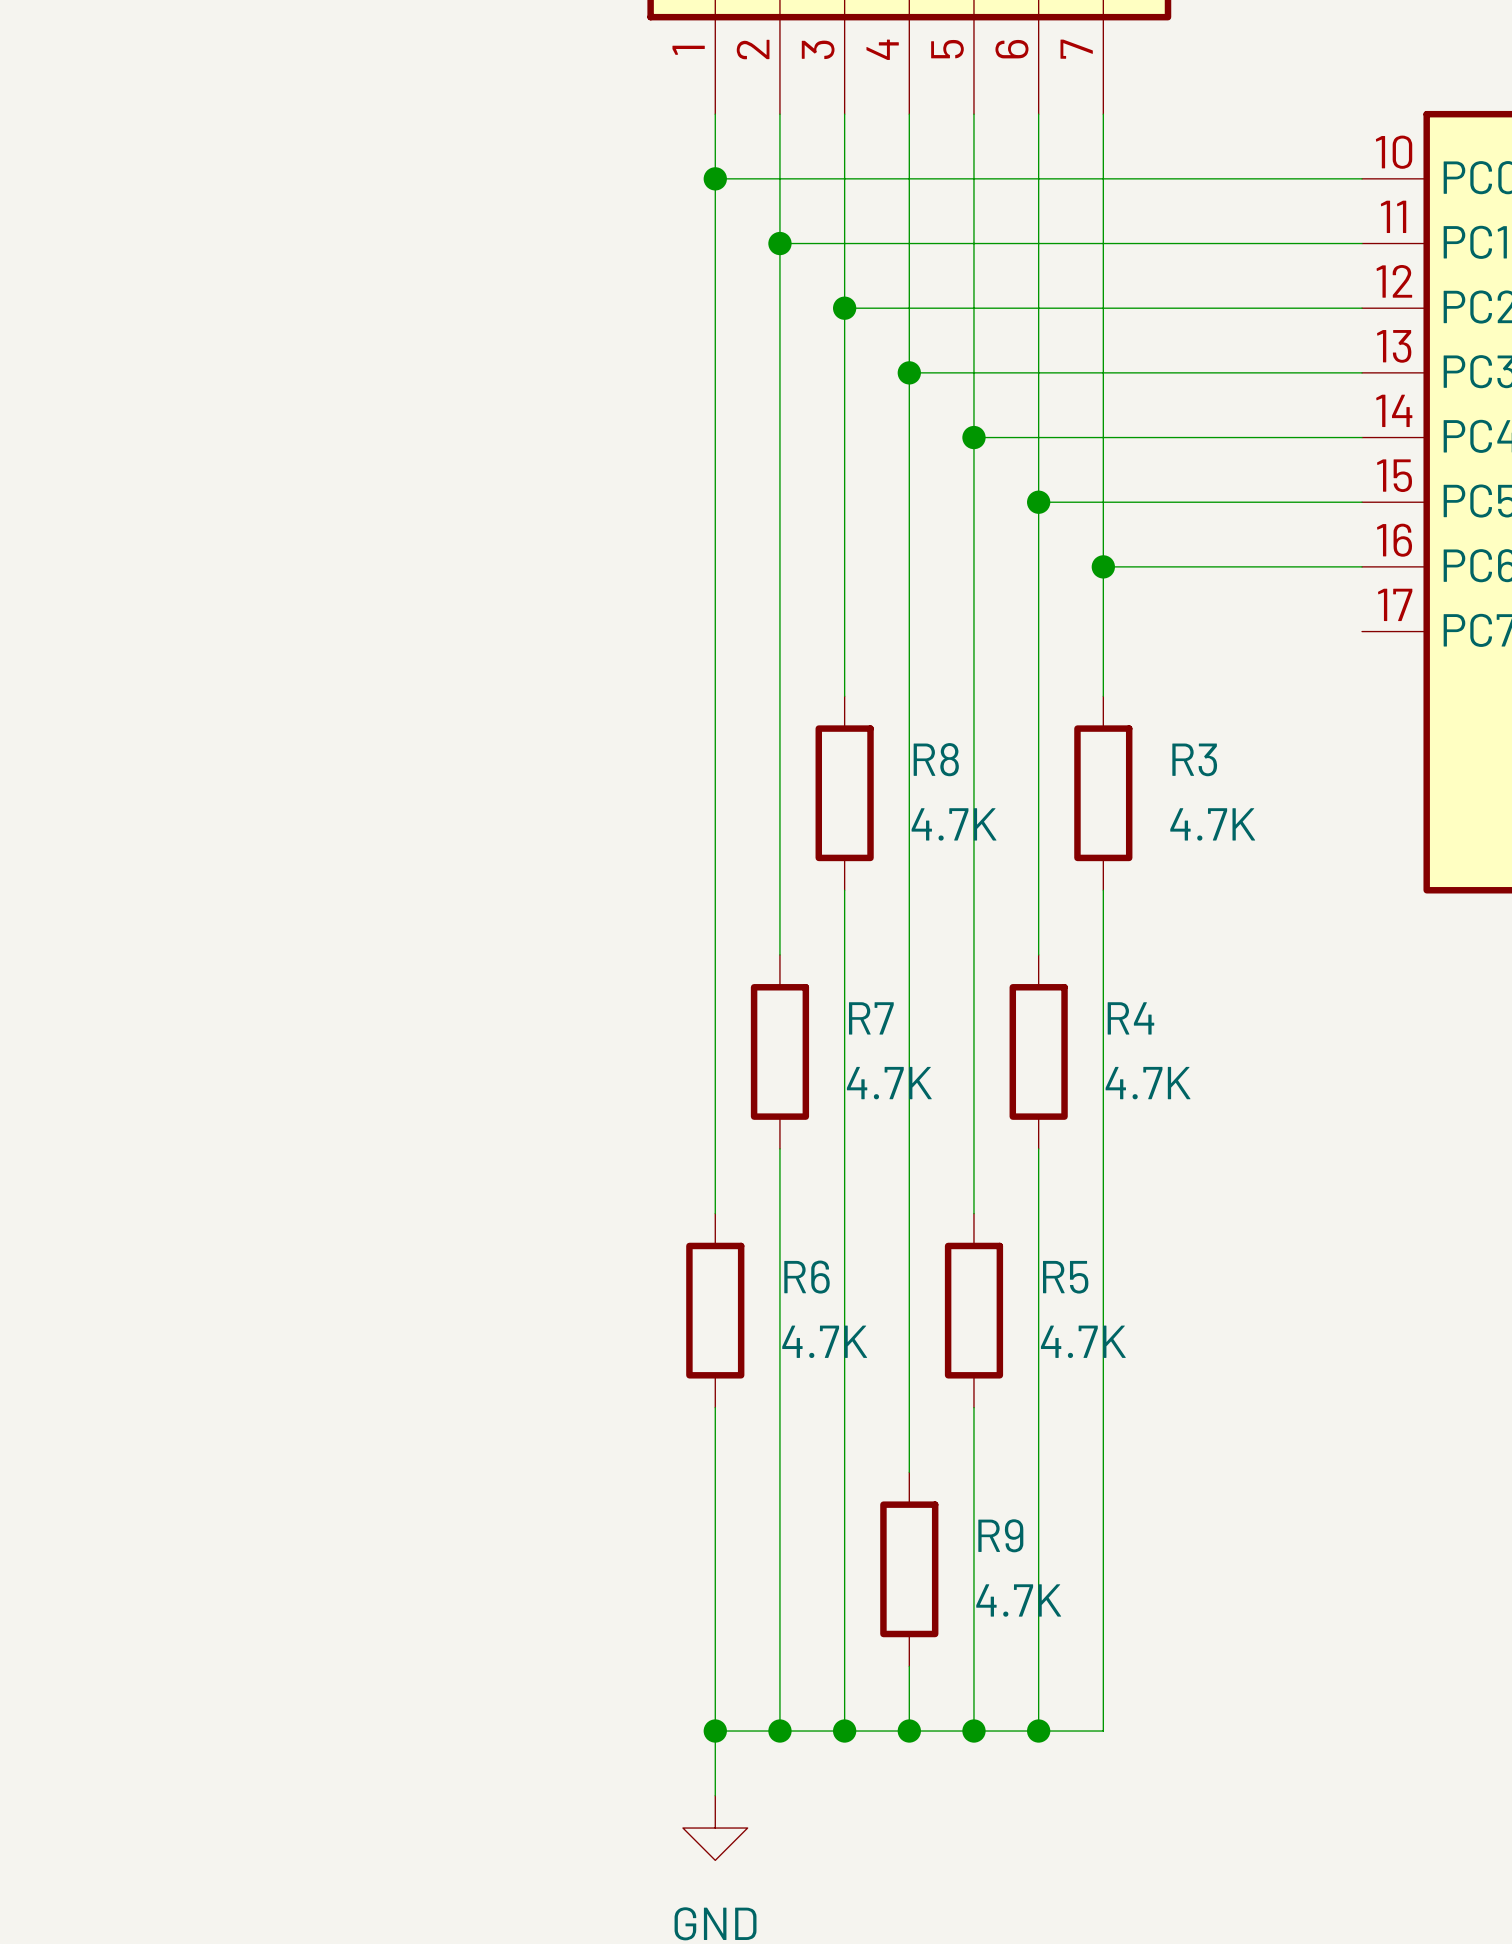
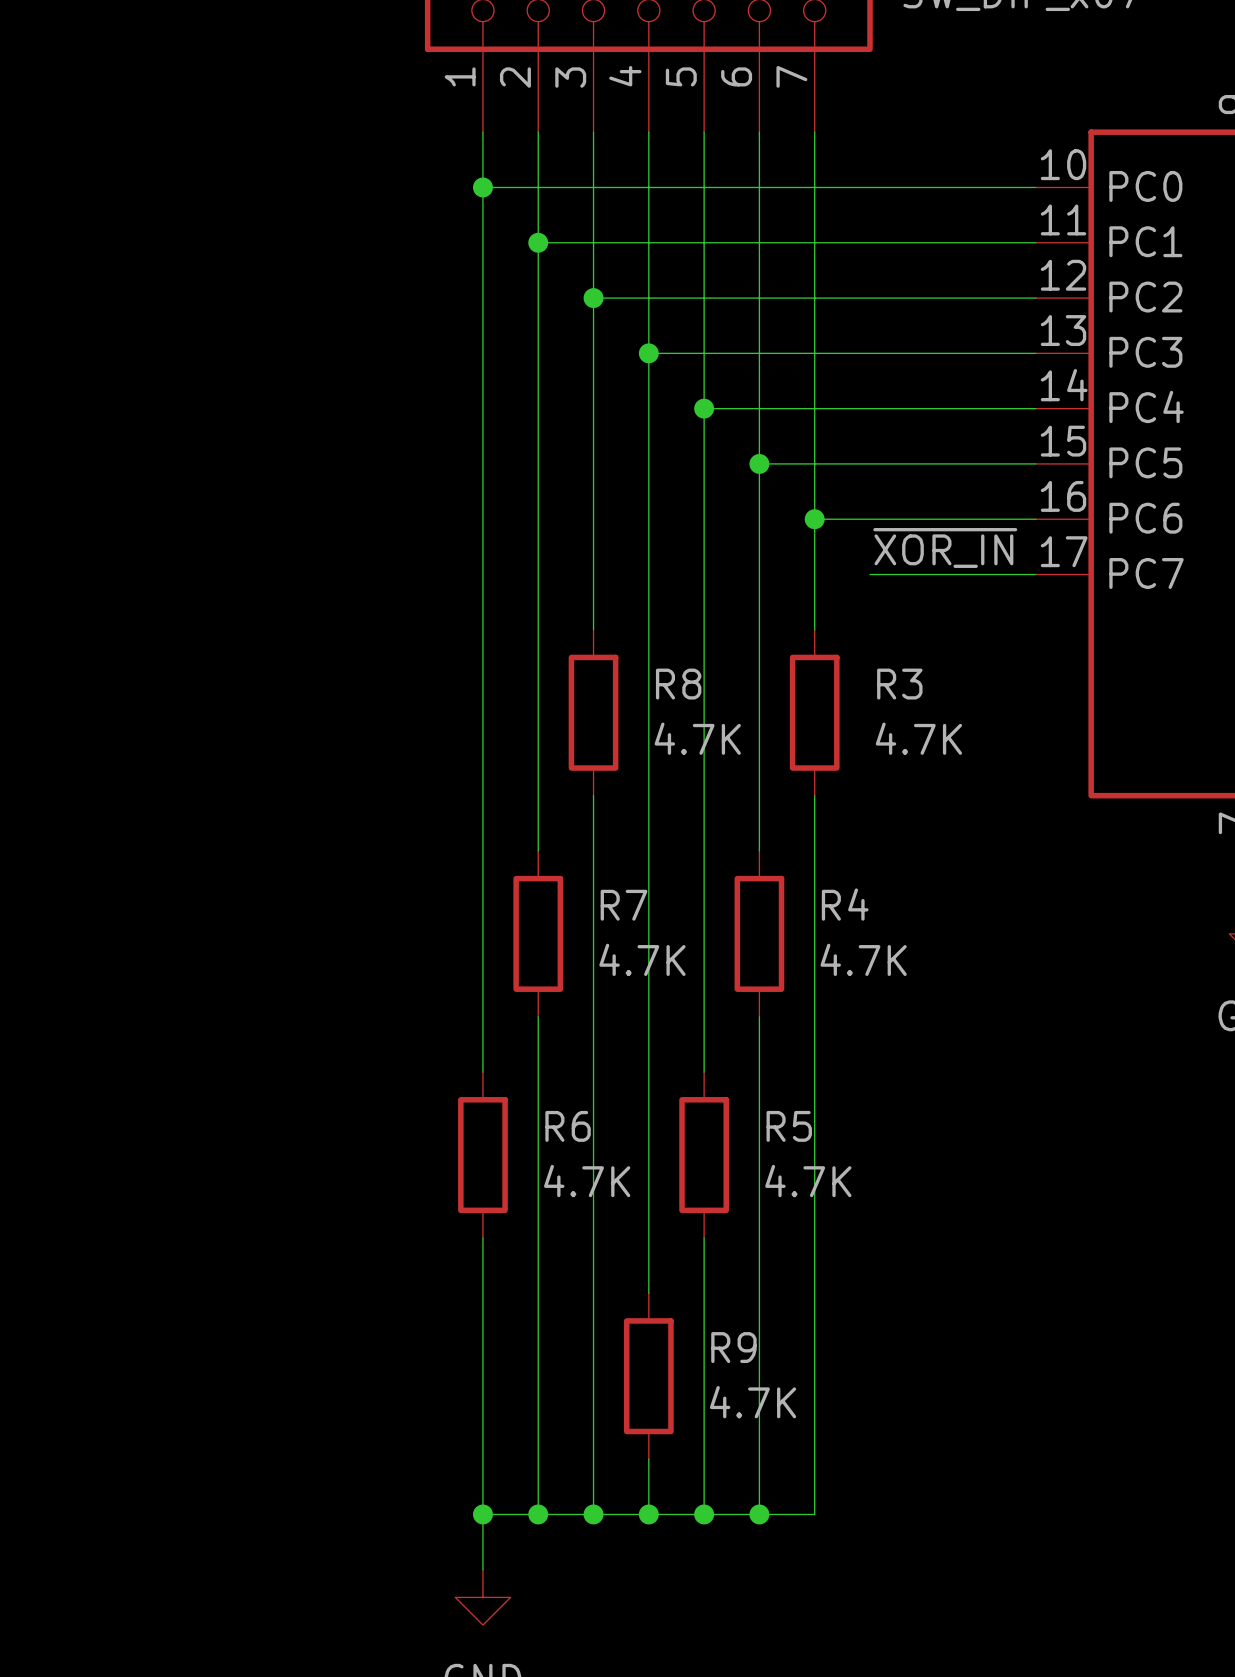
label: none -> ~{XOR_IN} (945, 547)
wire: none -> (869, 574) (1035, 574)

